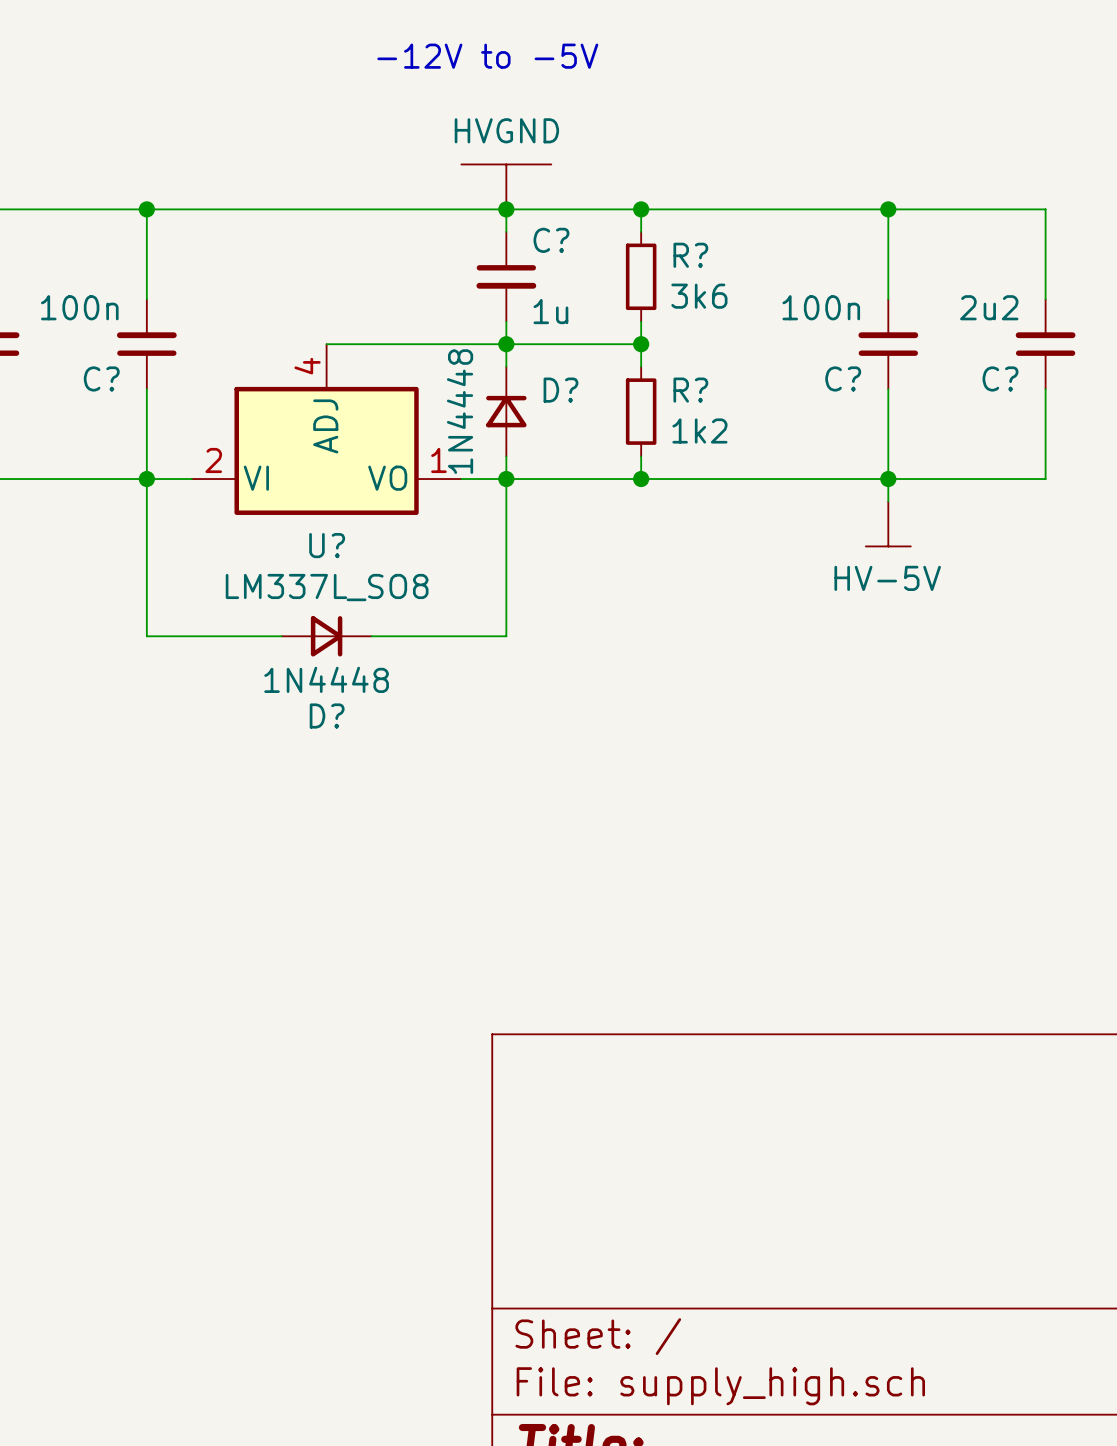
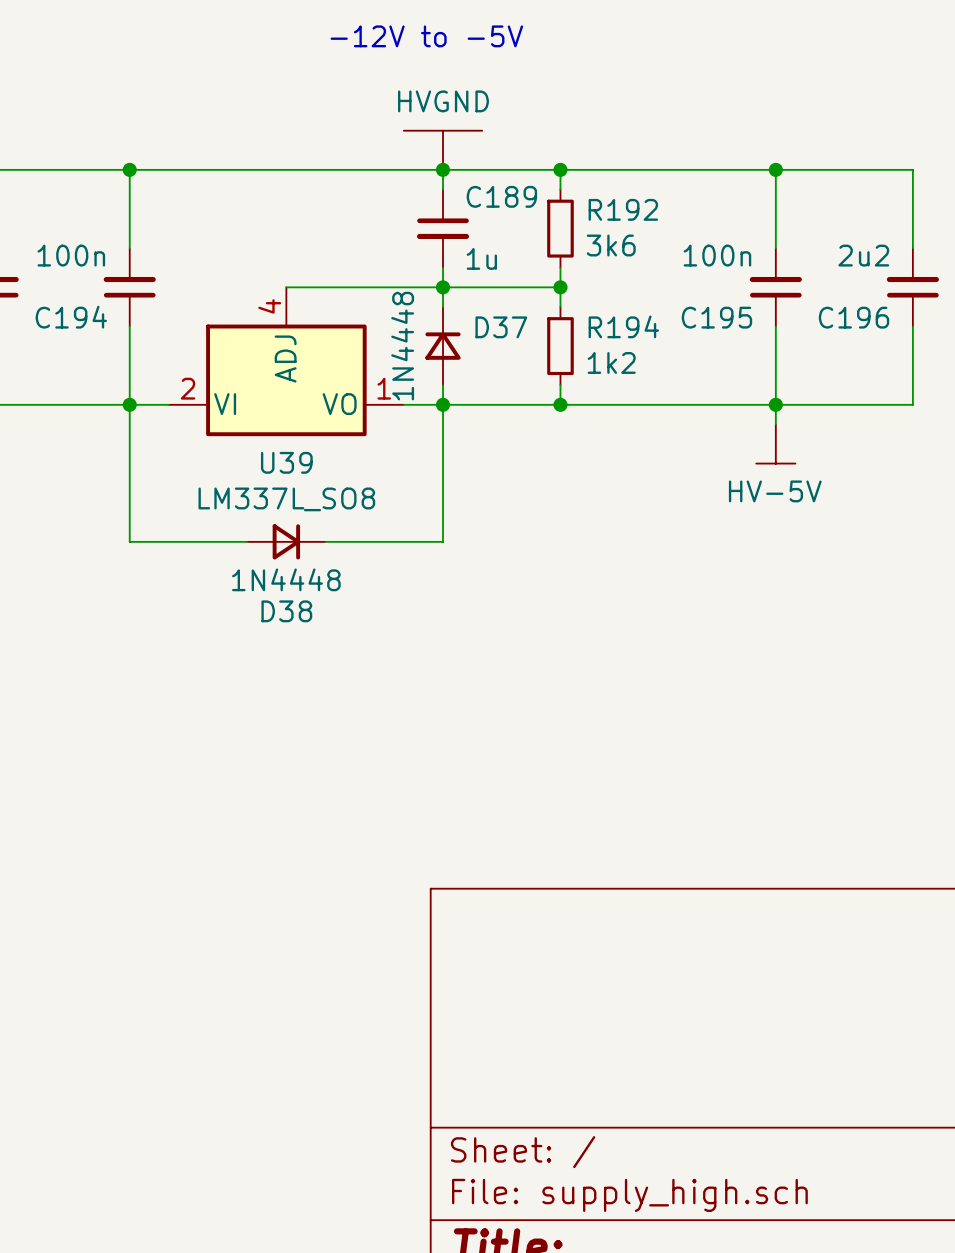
C? name: C? (551, 240) -> C189 (501, 196)
R? name: R? (690, 255) -> R192 (623, 209)
C? name: C? (101, 378) -> C194 (71, 317)
C? name: C? (843, 378) -> C195 (716, 317)
C? name: C? (1000, 378) -> C196 (854, 317)
D? name: D? (560, 390) -> D37 (501, 327)
R? name: R? (690, 390) -> R194 (623, 326)
U? name: U? (327, 545) -> U39 (286, 462)
D? name: D? (327, 716) -> D38 (286, 611)

